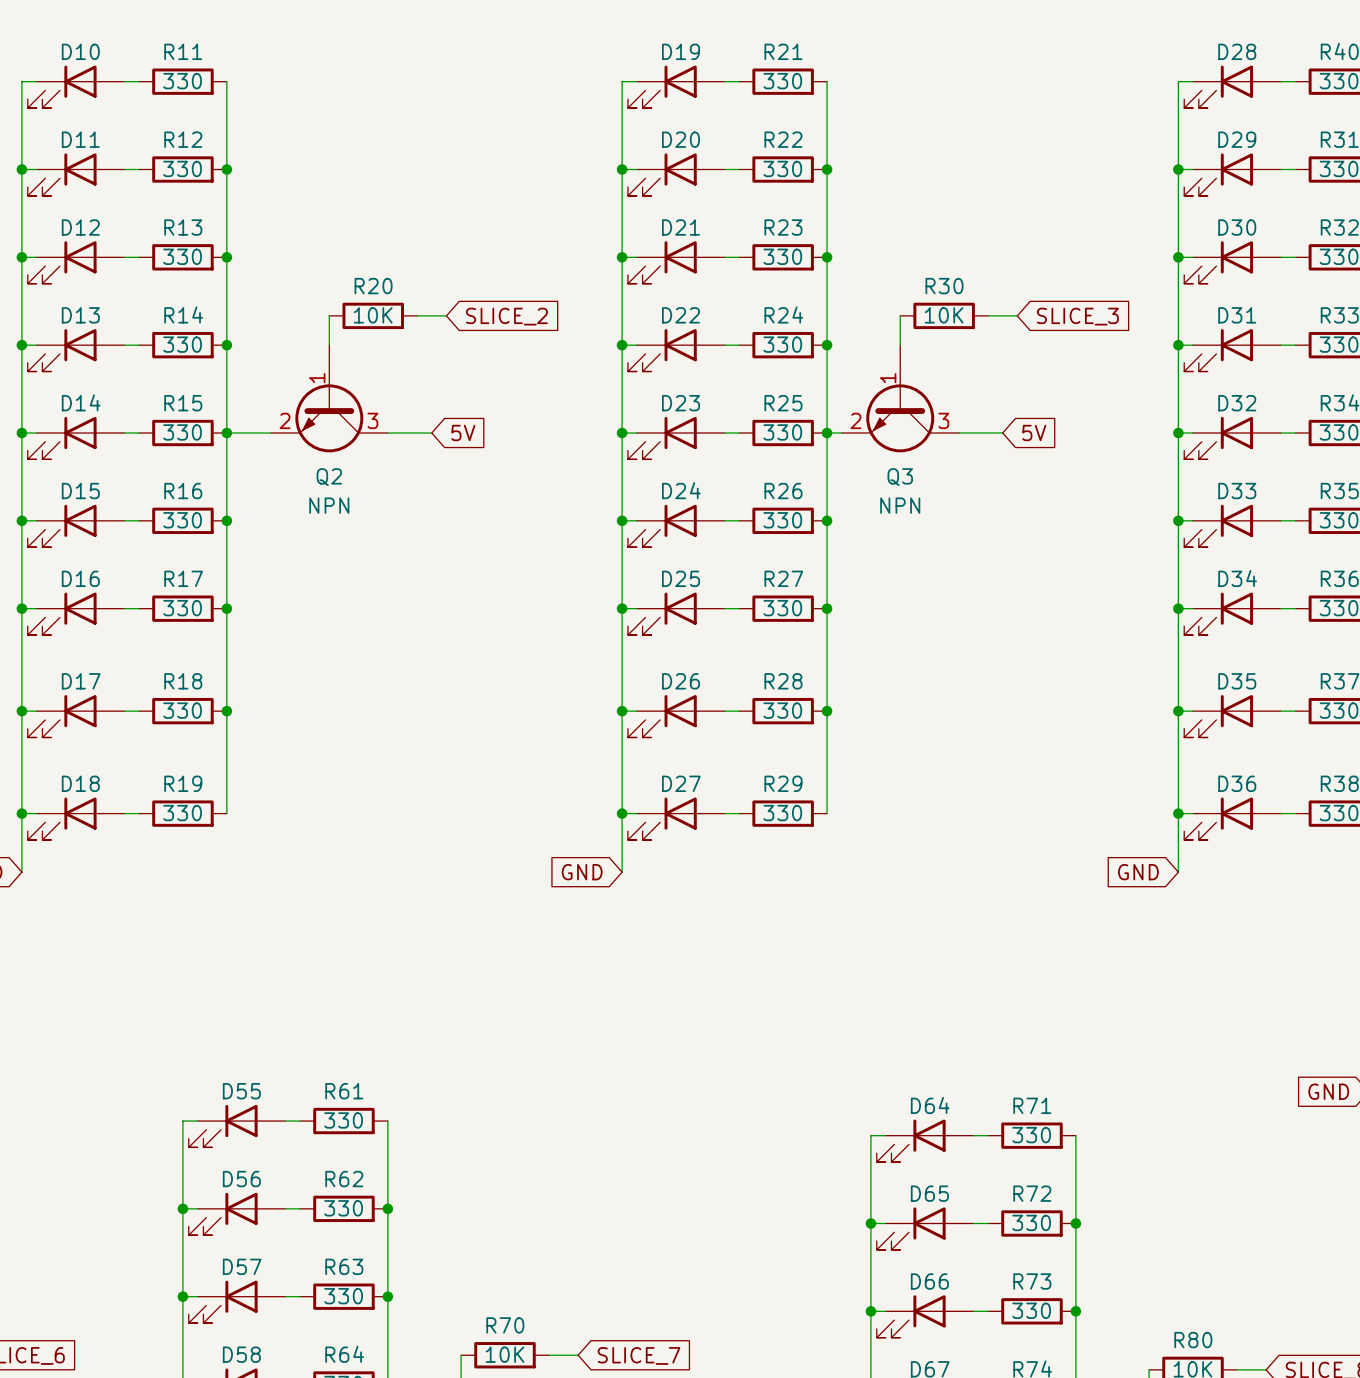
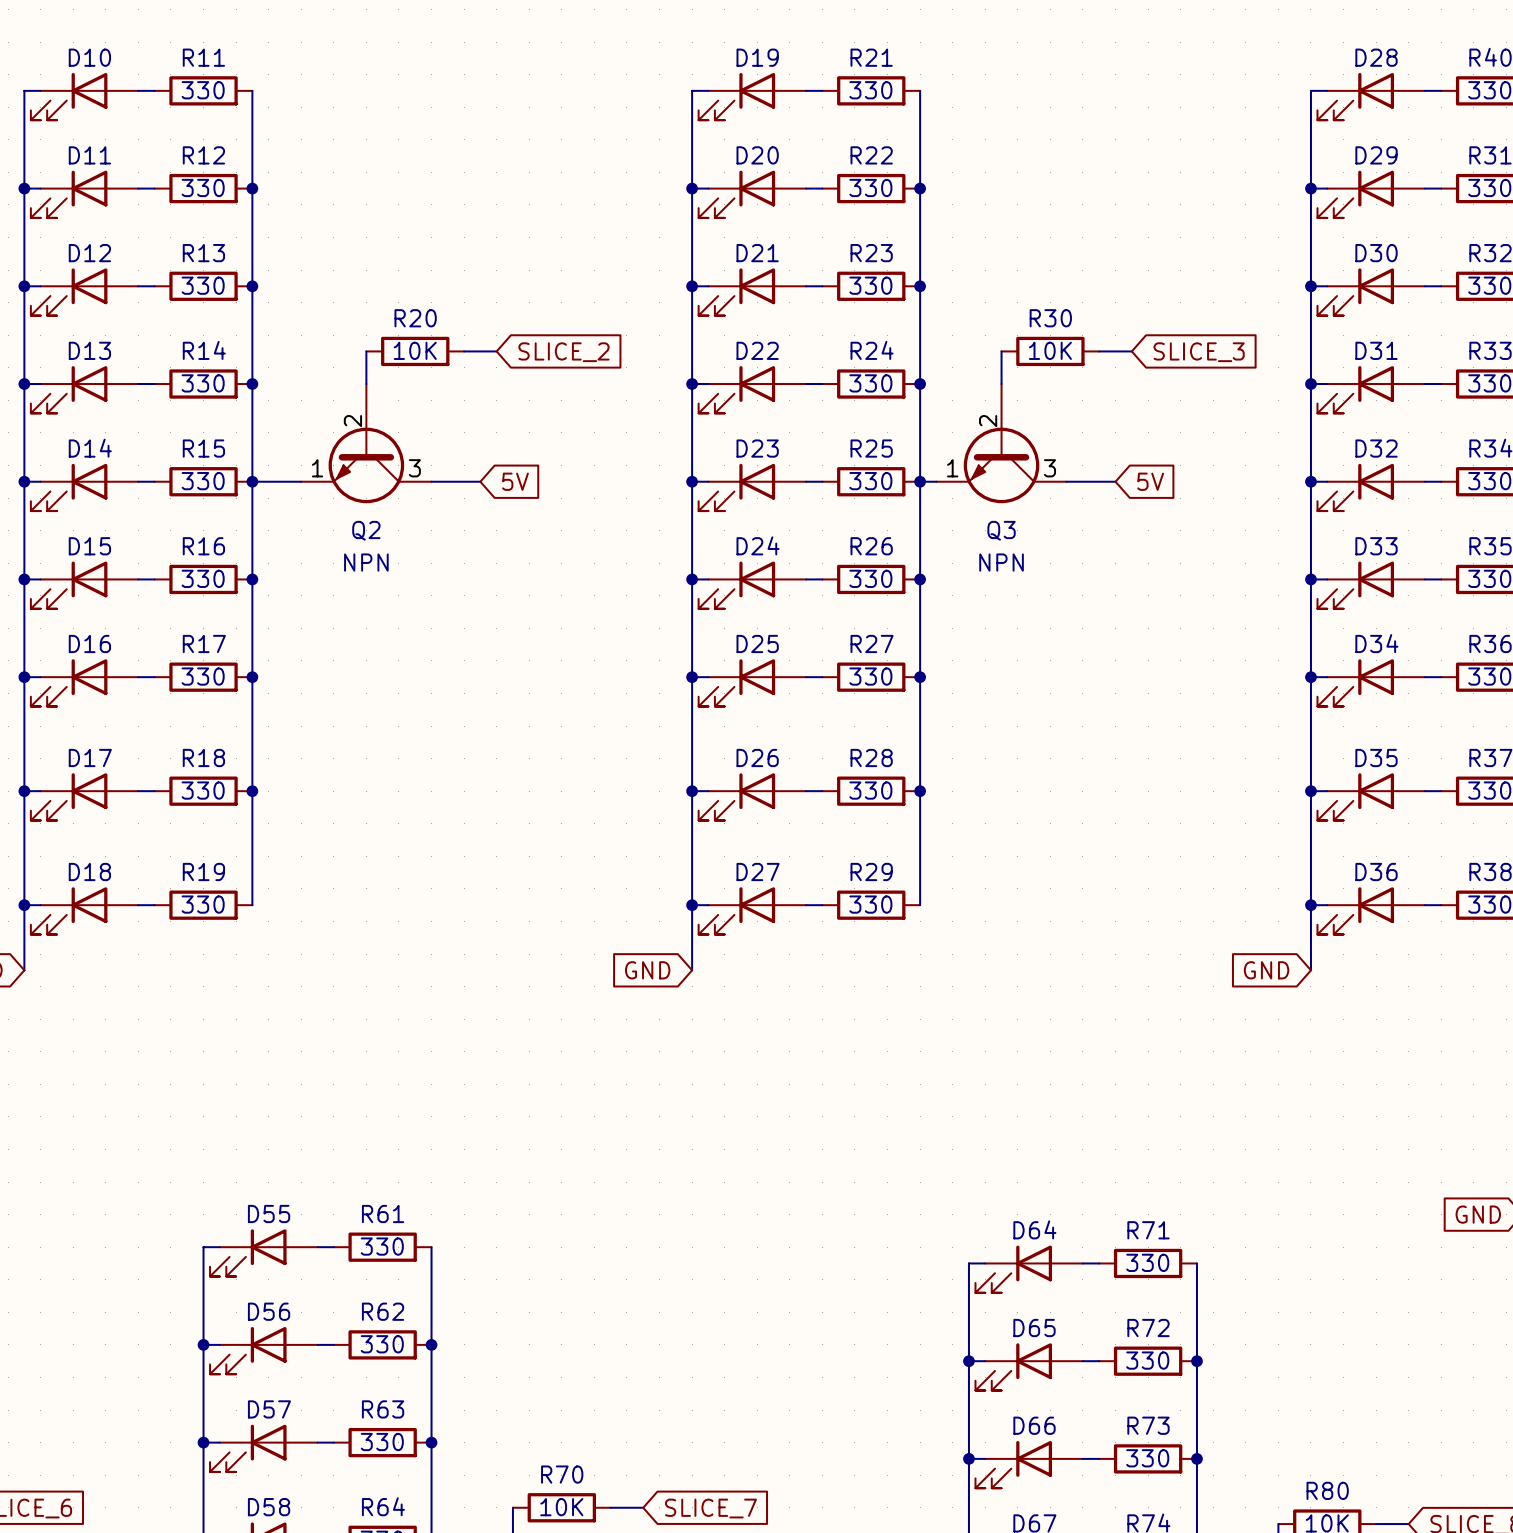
Q2 pin number: 1 (317, 378) -> 2 (352, 421)
Q3 pin number: 1 (888, 378) -> 2 (988, 421)
Q2 pin number: 2 (285, 420) -> 1 (317, 468)
Q3 pin number: 2 (855, 420) -> 1 (952, 468)

